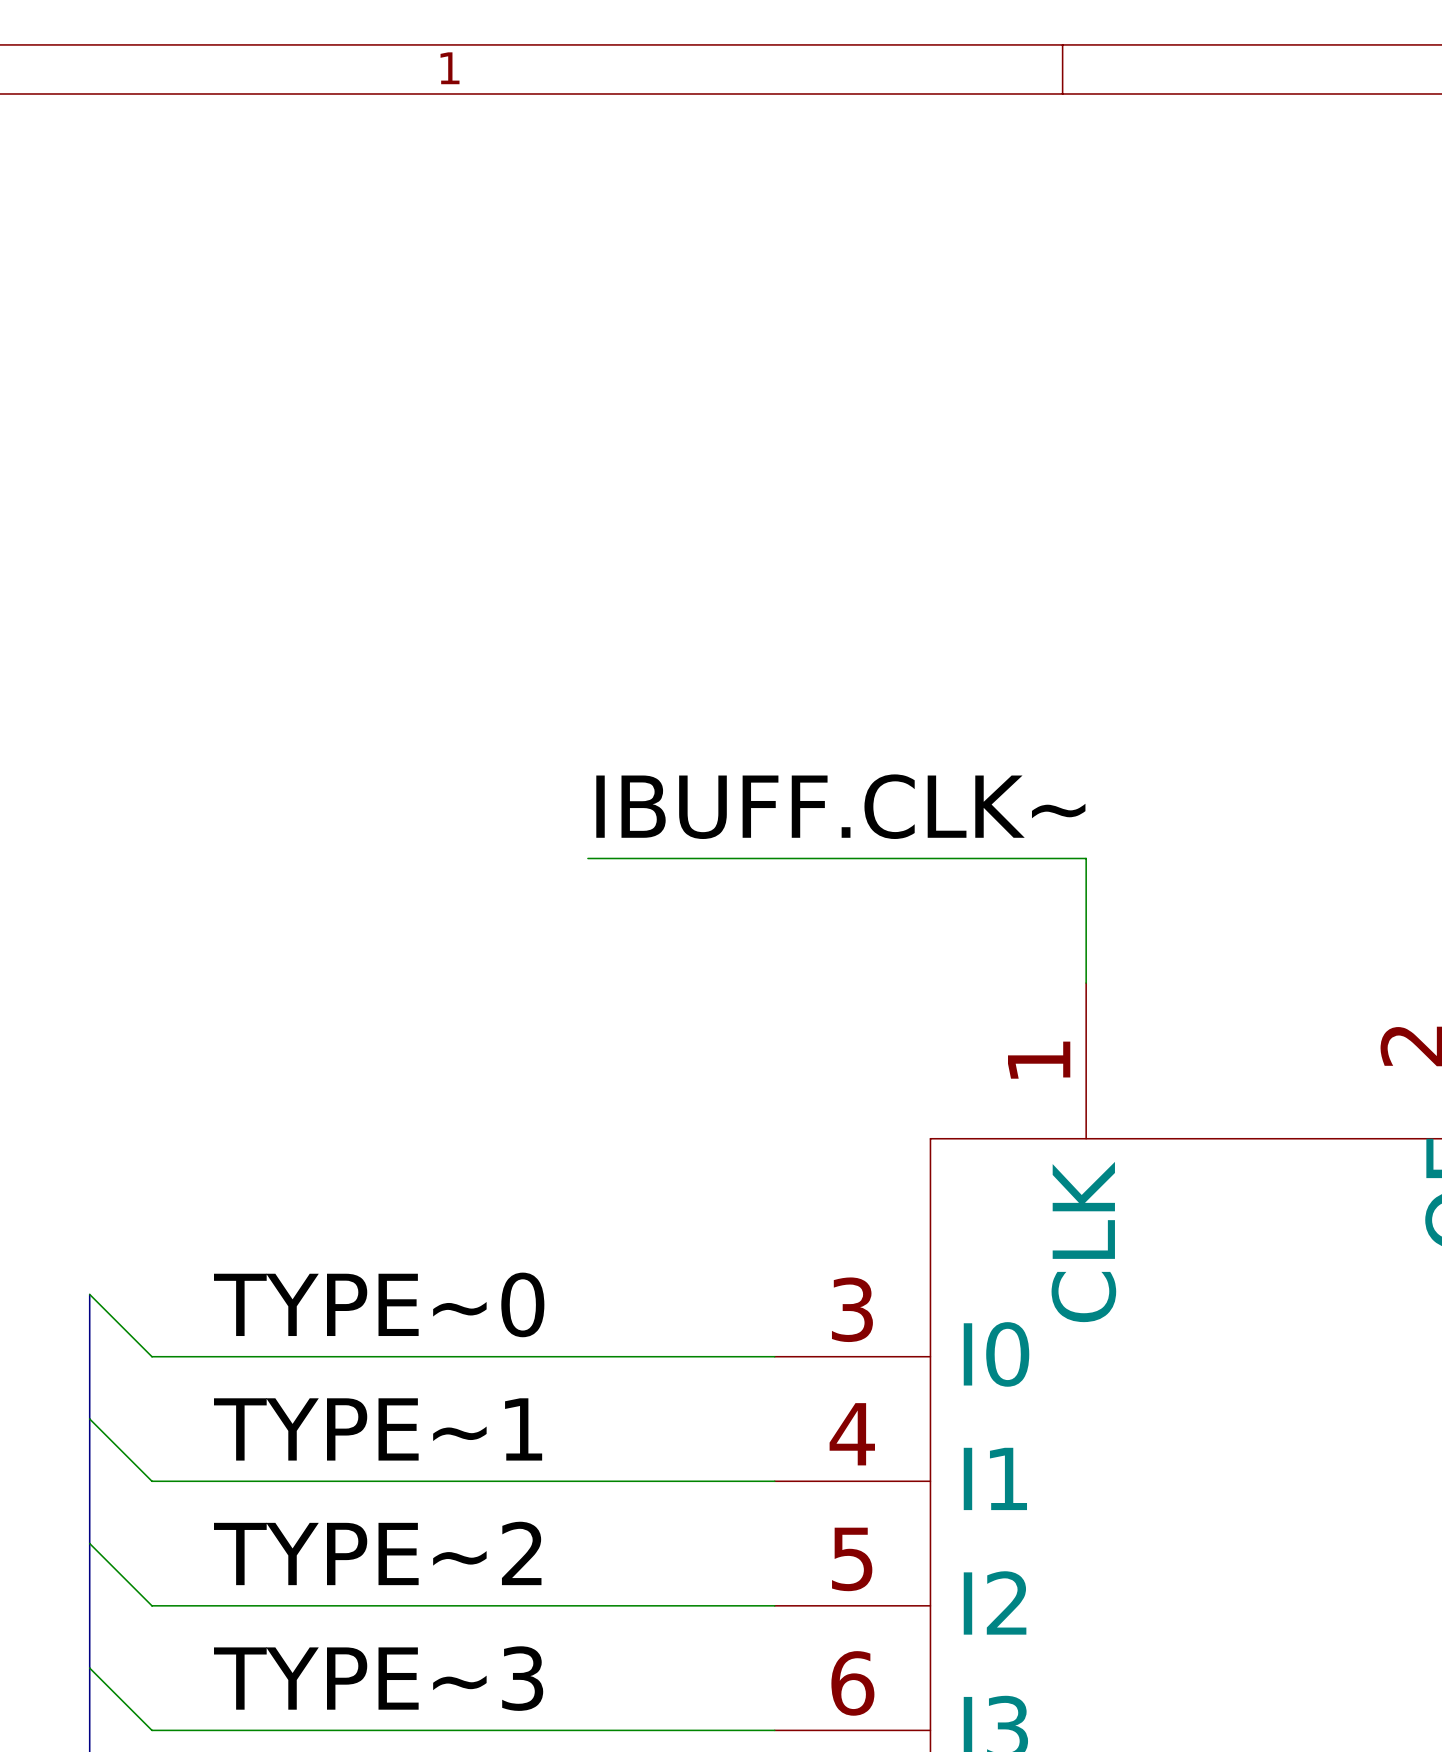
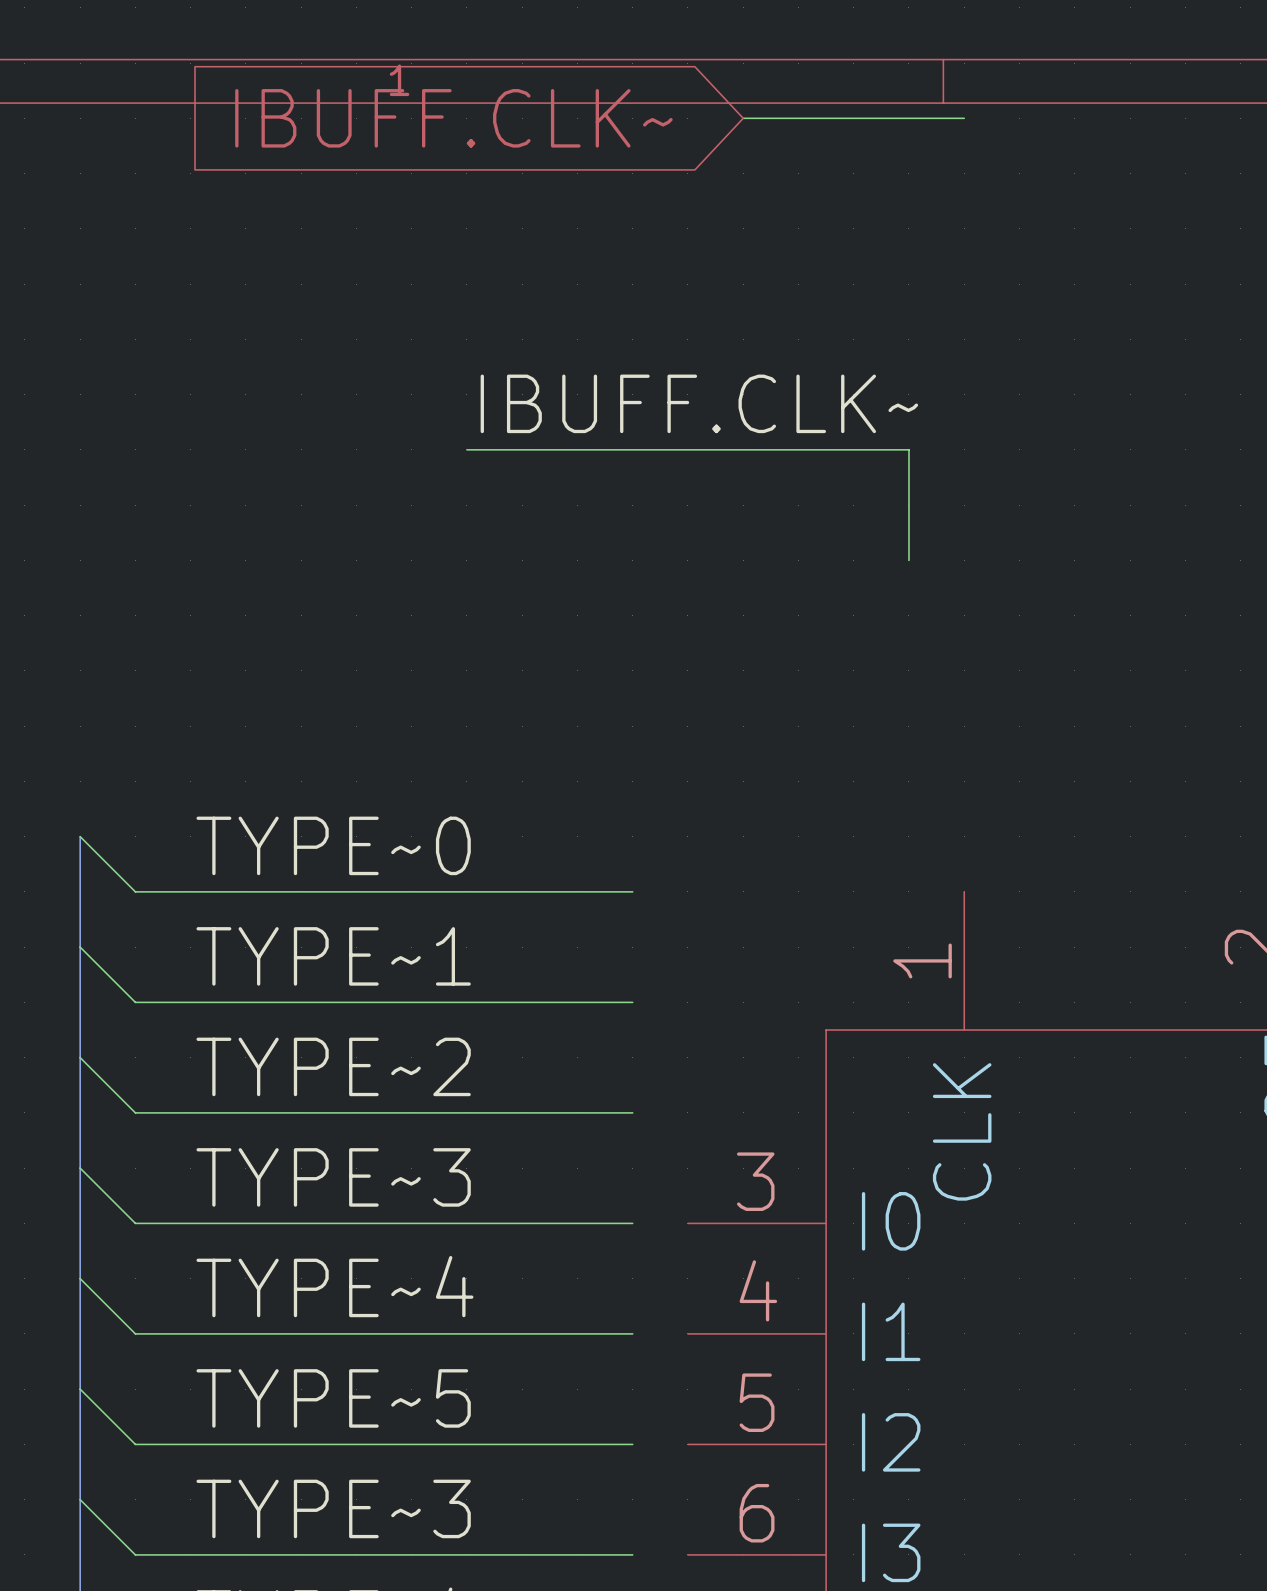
global label: none -> IBUFF.CLK~ (453, 118)
wire: none -> (743, 118) (964, 118)
label position: IBUFF.CLK~ (840, 806) -> IBUFF.CLK~ (699, 403)
wire: (587, 858) (1086, 858) (1086, 983) -> (466, 449) (908, 449) (908, 560)
bus: none -> (80, 836) (80, 1168)
wire: none -> (80, 836) (135, 891) (632, 891)
label: none -> TYPE~0 (333, 845)
wire: none -> (80, 947) (135, 1002) (632, 1002)
label: none -> TYPE~1 (333, 956)
wire: none -> (80, 1057) (135, 1112) (632, 1112)
label: none -> TYPE~2 (333, 1066)
label: TYPE~0 (379, 1304) -> TYPE~3 (333, 1177)
wire: (712, 1356) (774, 1356) -> none
label: TYPE~1 (378, 1429) -> TYPE~4 (334, 1286)
wire: (712, 1481) (774, 1481) -> none
label: TYPE~2 (377, 1553) -> TYPE~5 (333, 1398)
wire: (712, 1605) (774, 1605) -> none
wire: (712, 1730) (774, 1730) -> none

